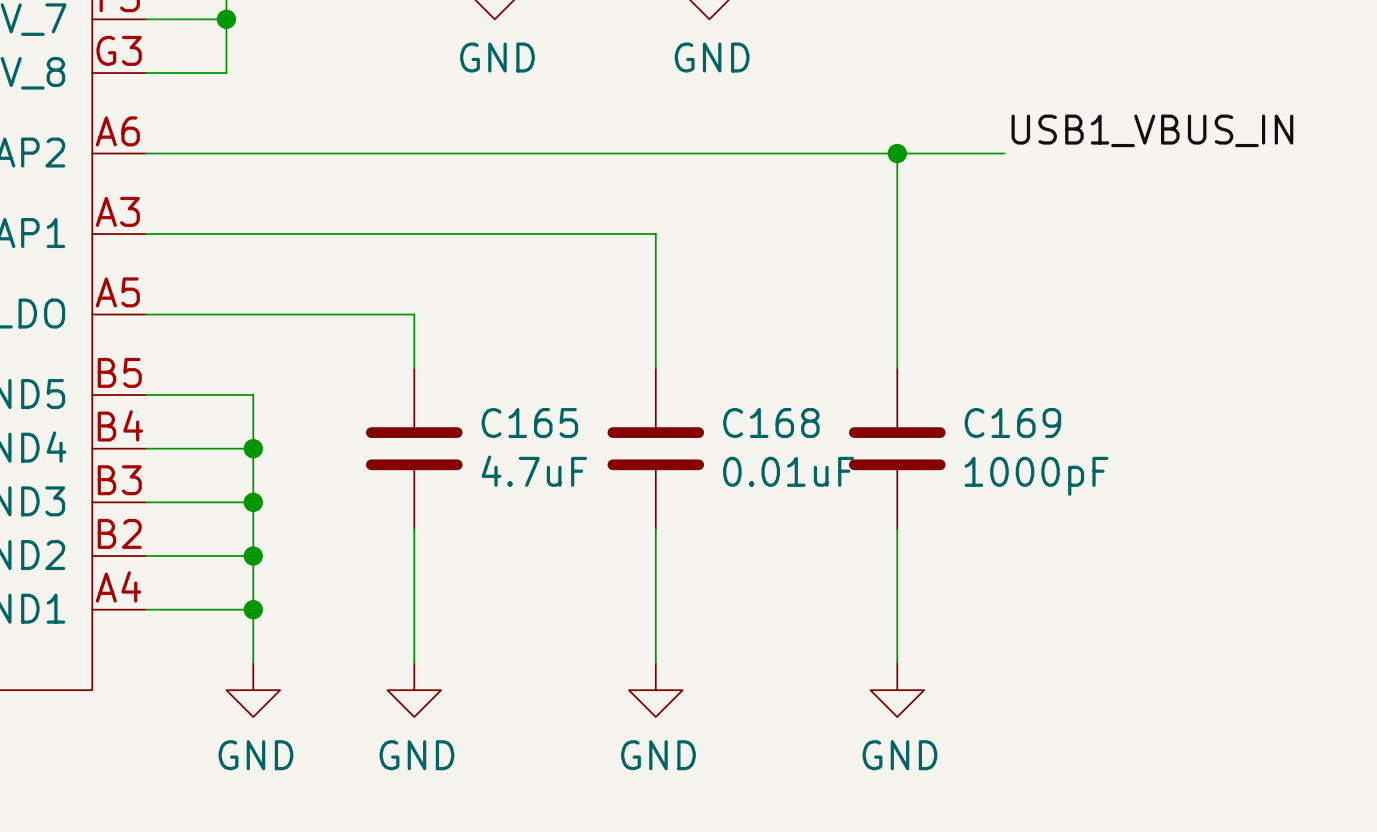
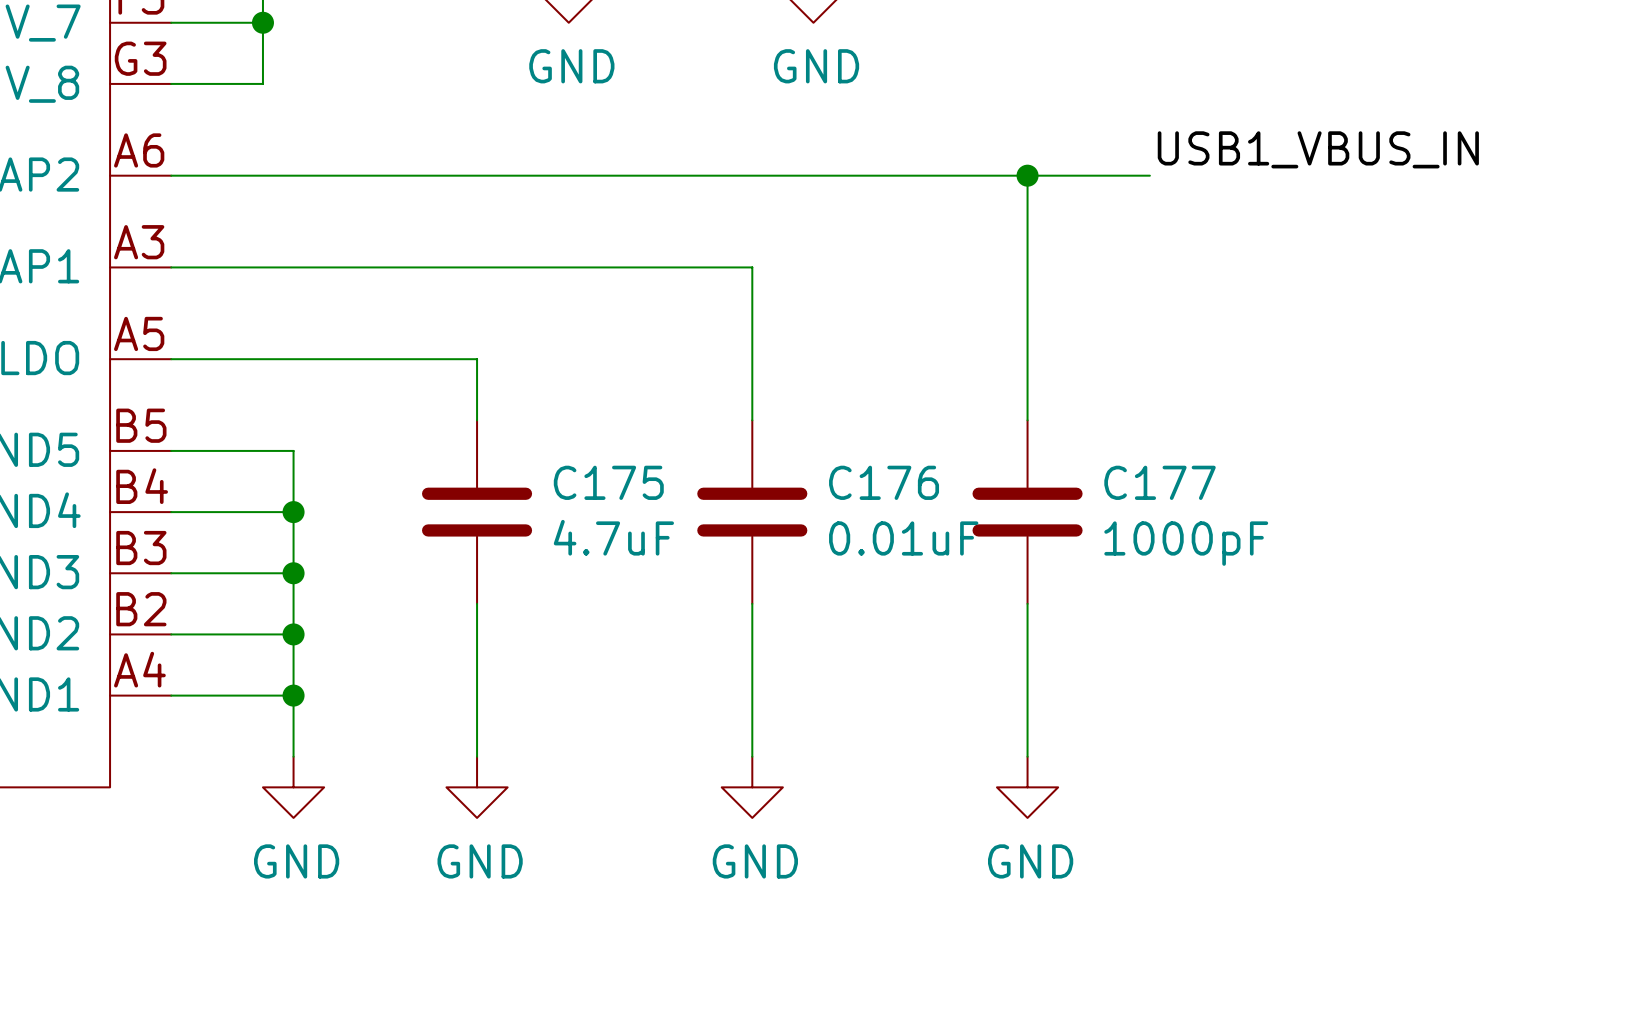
C165 name: C165 (529, 423) -> C175 (608, 482)
C168 name: C168 (771, 423) -> C176 (884, 482)
C169 name: C169 (1012, 423) -> C177 (1160, 482)

